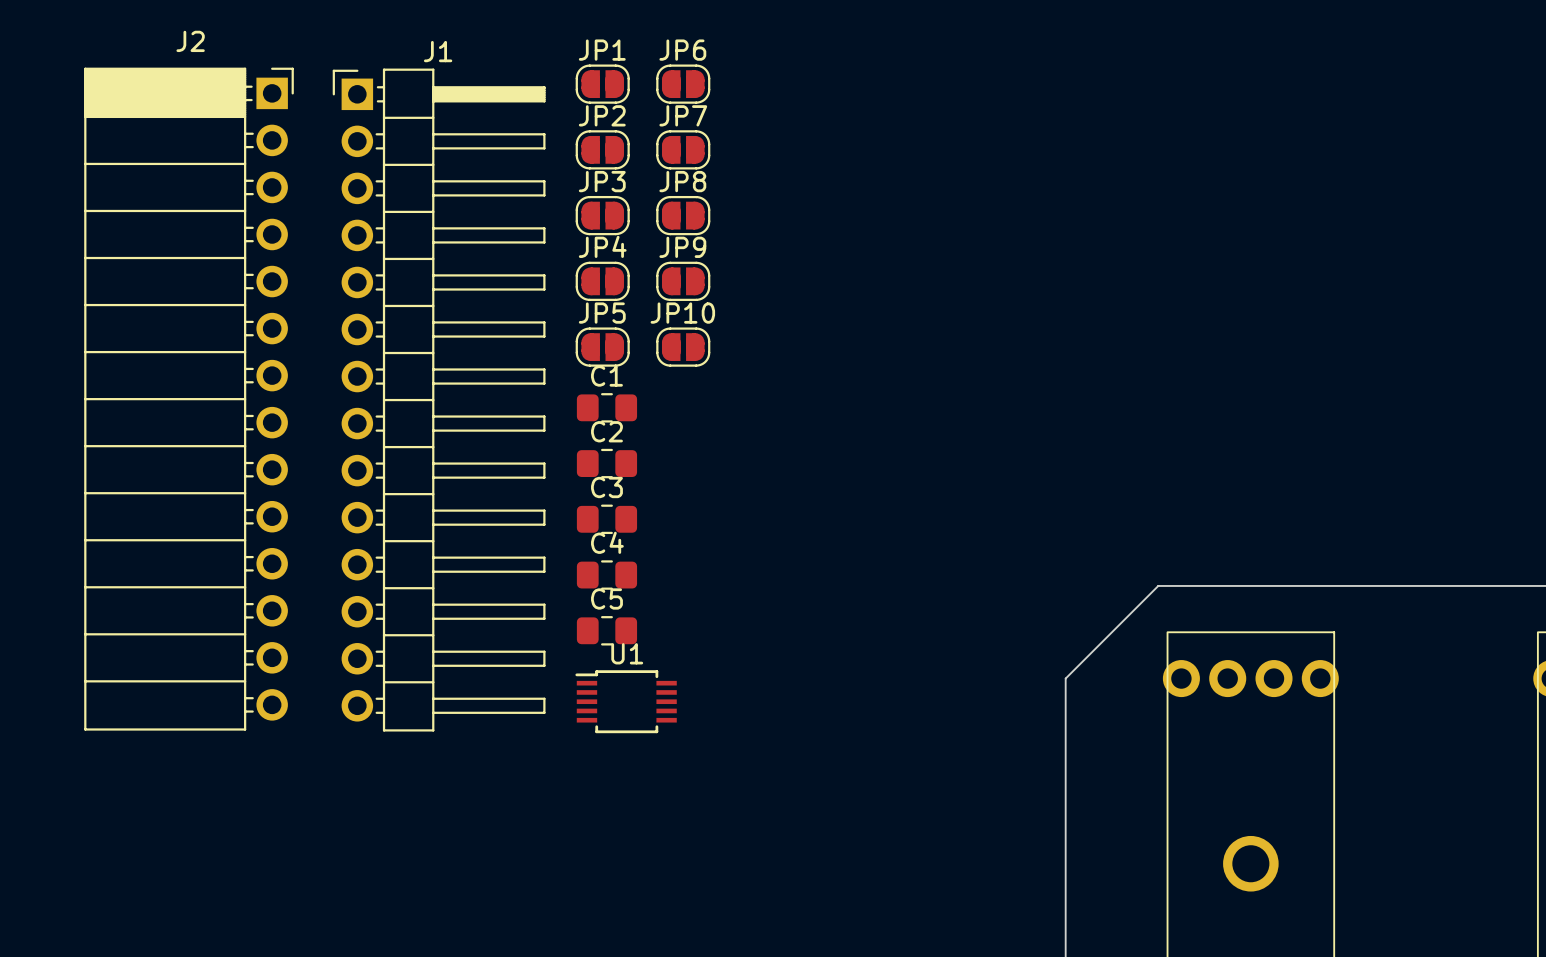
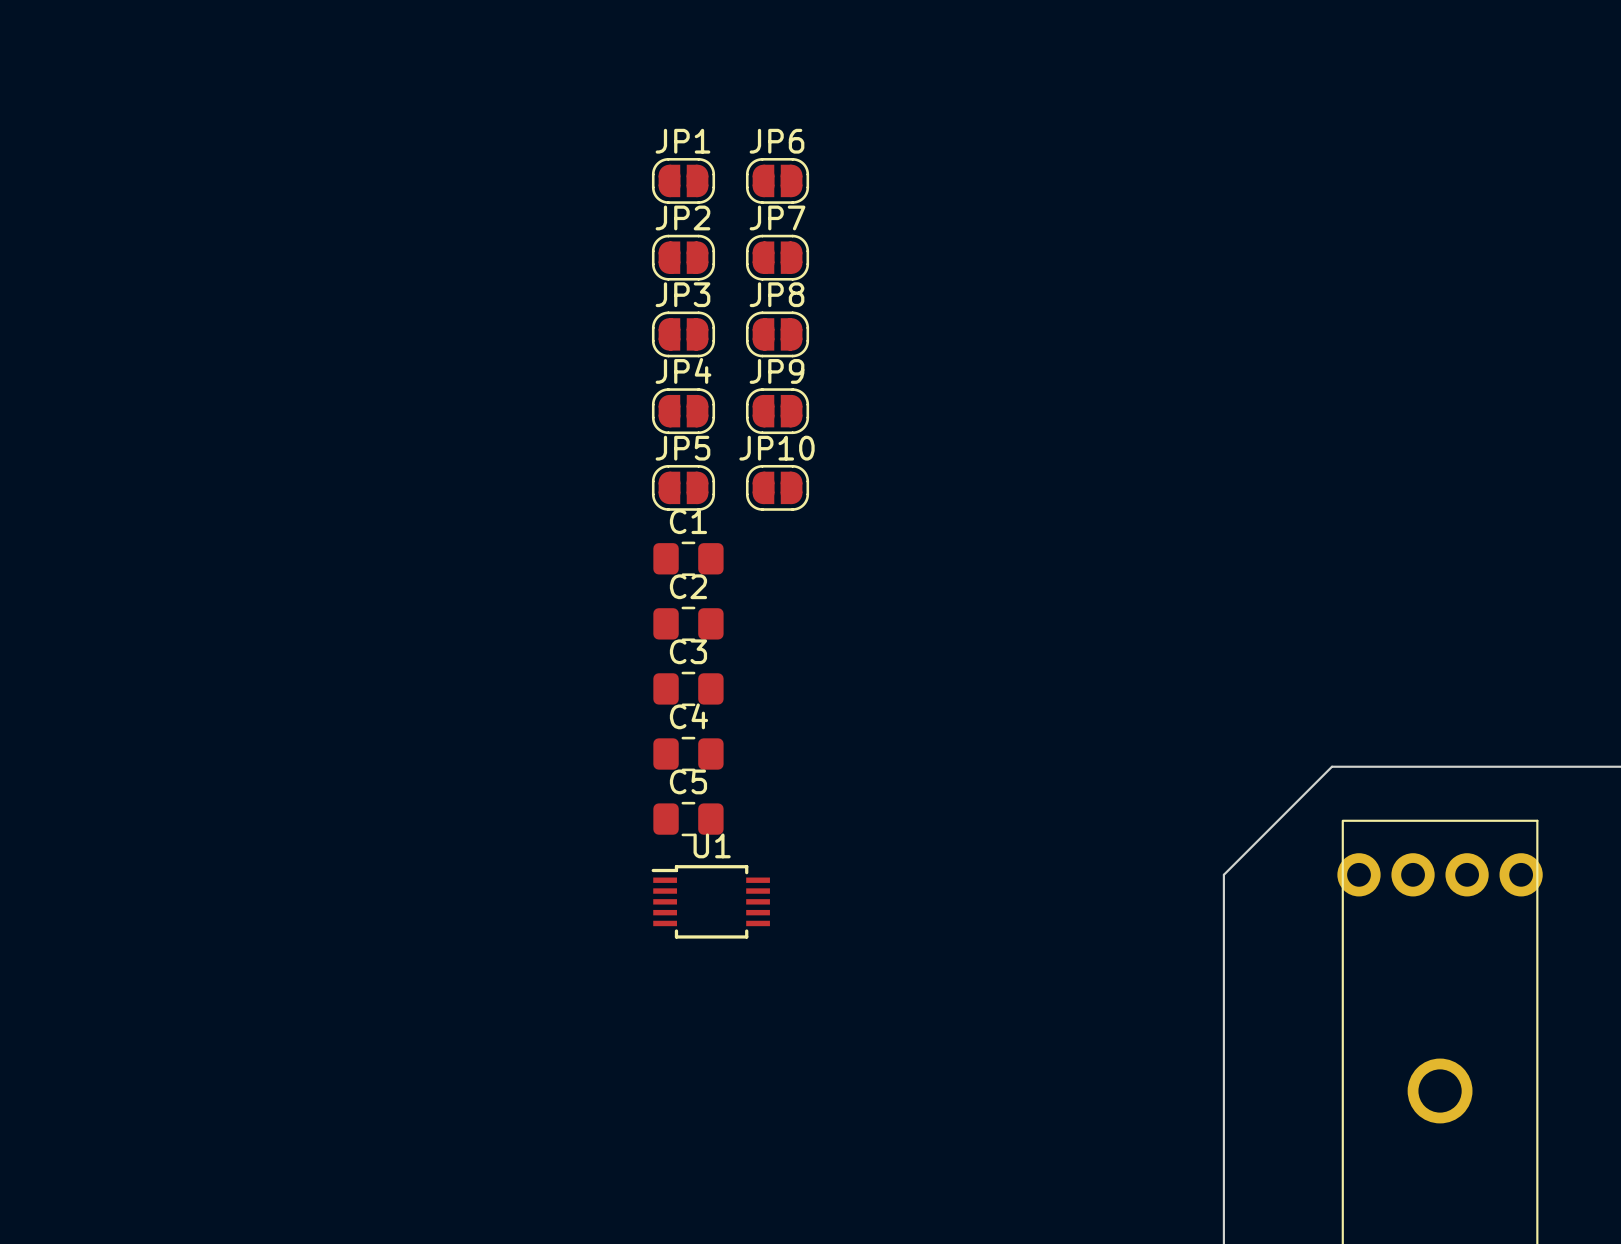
J2: (189, 399) -> none
J1: (439, 400) -> none

